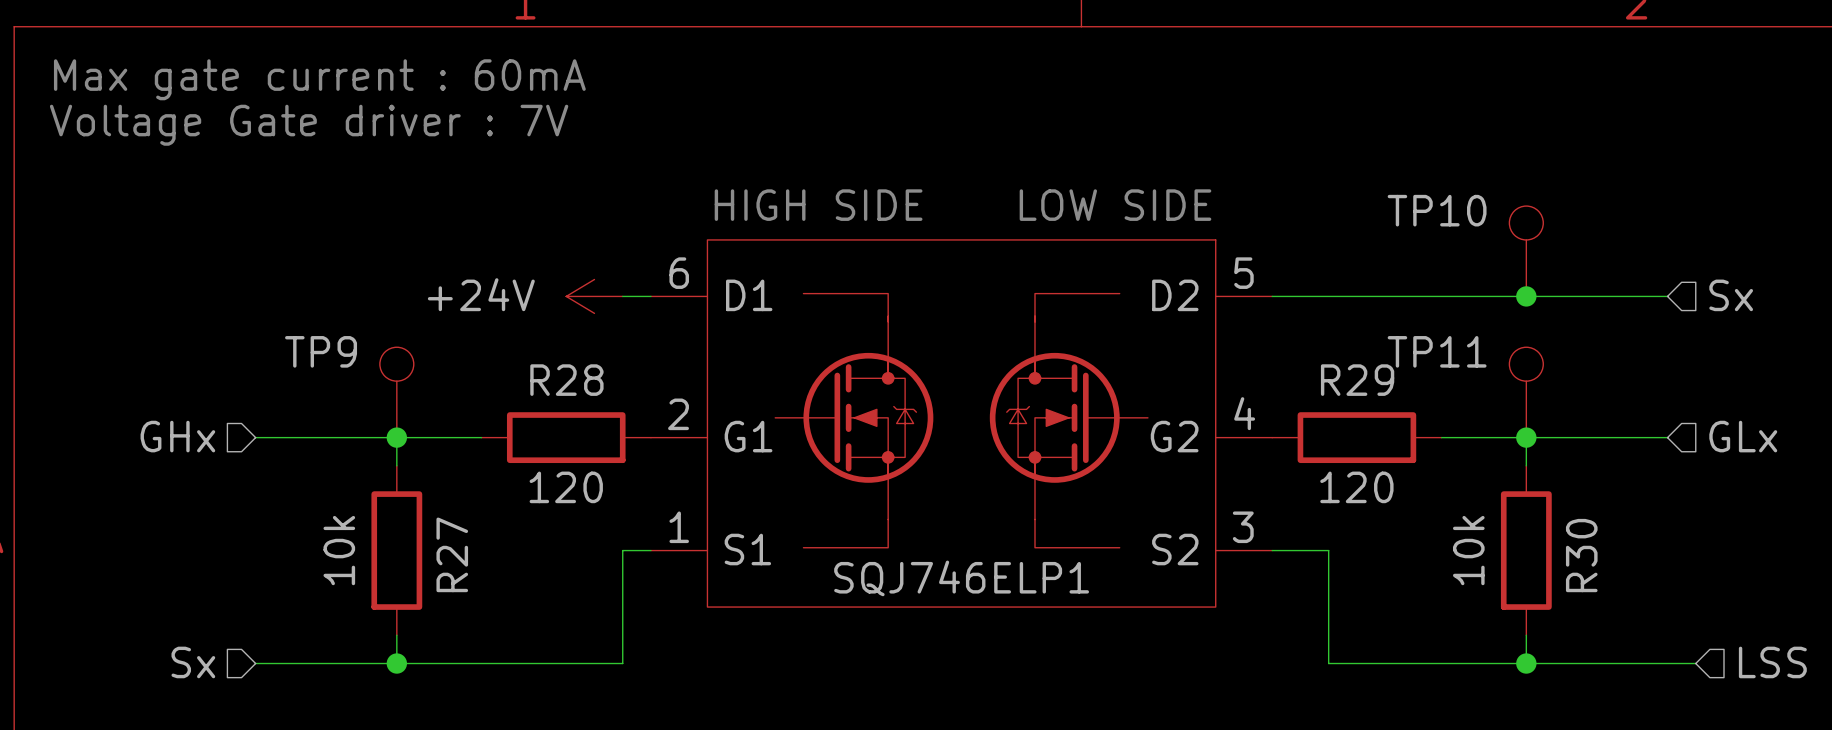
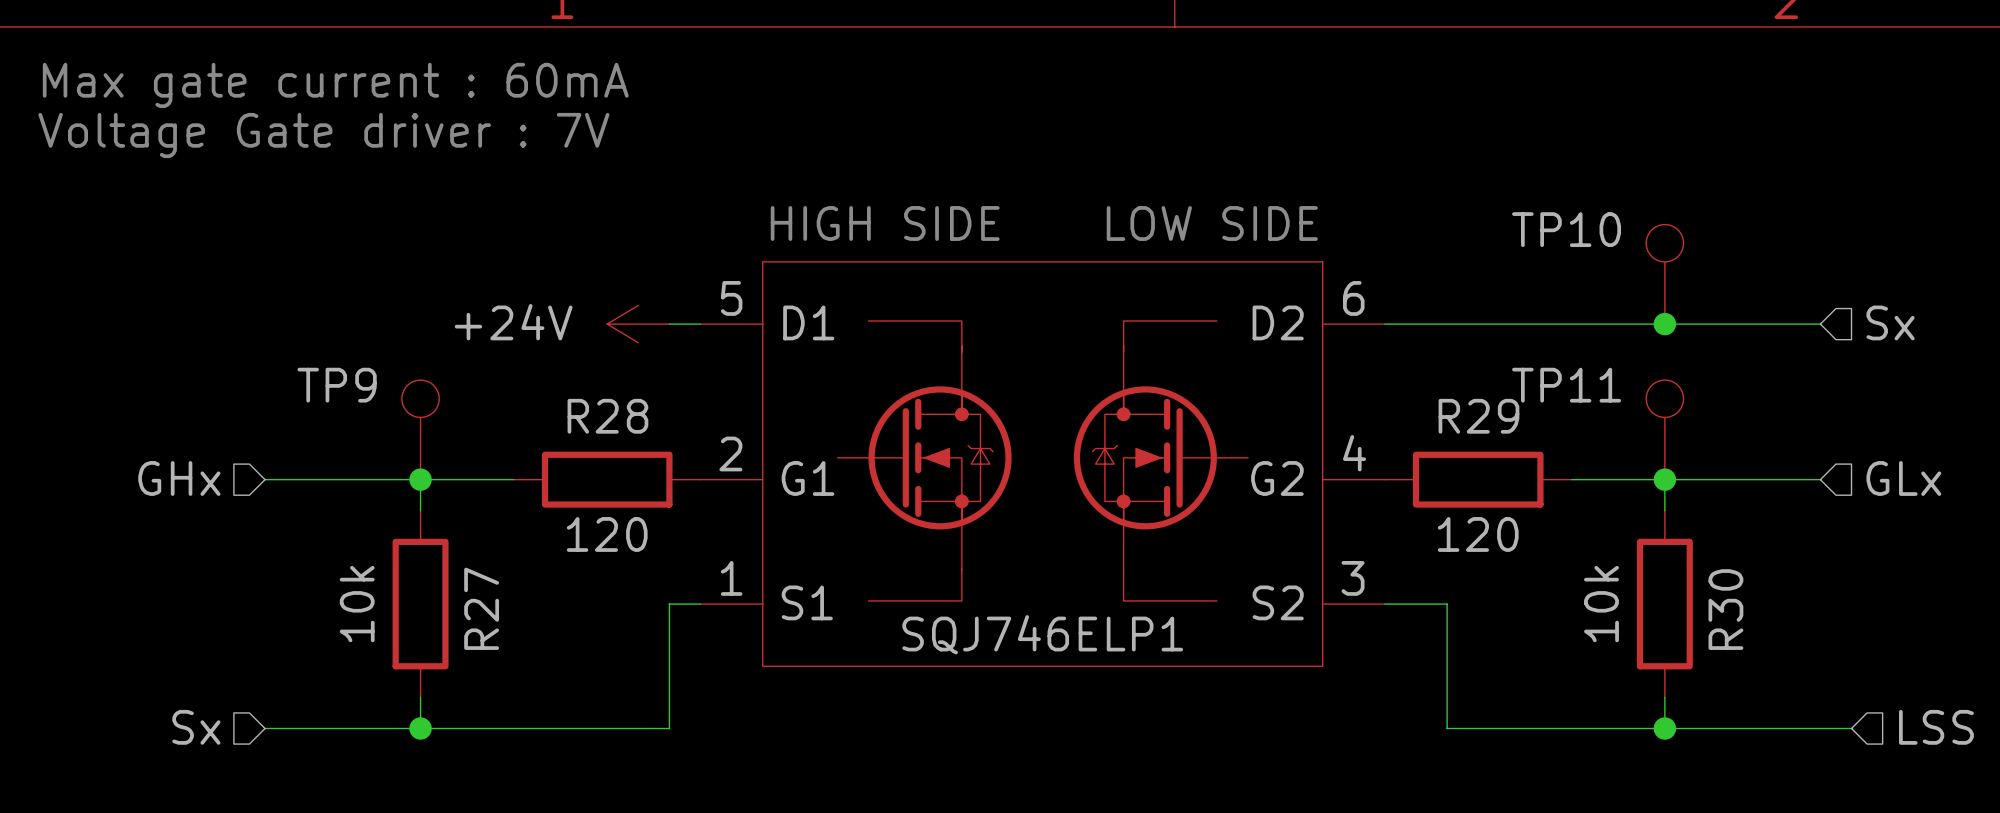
SQJ746ELP1 pin number: 6 (679, 273) -> 5 (731, 298)
SQJ746ELP1 pin number: 5 (1243, 273) -> 6 (1353, 298)

